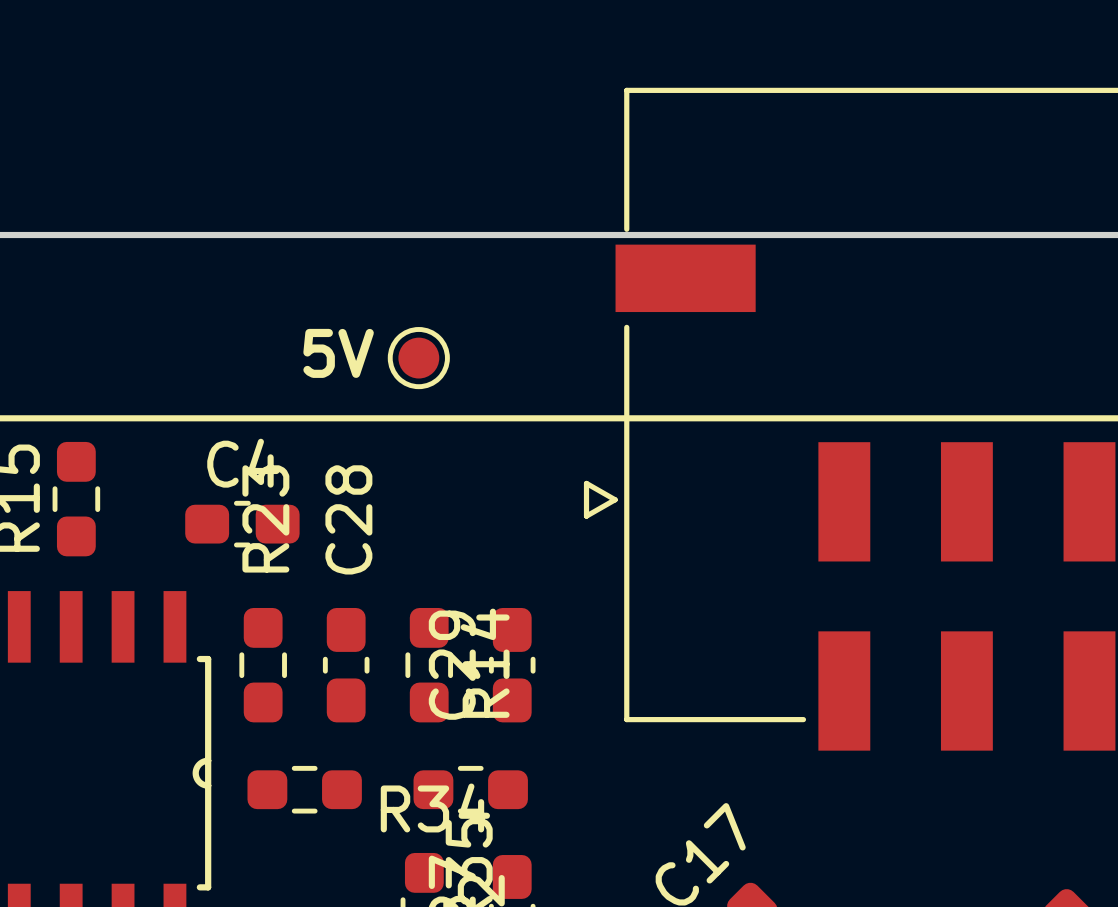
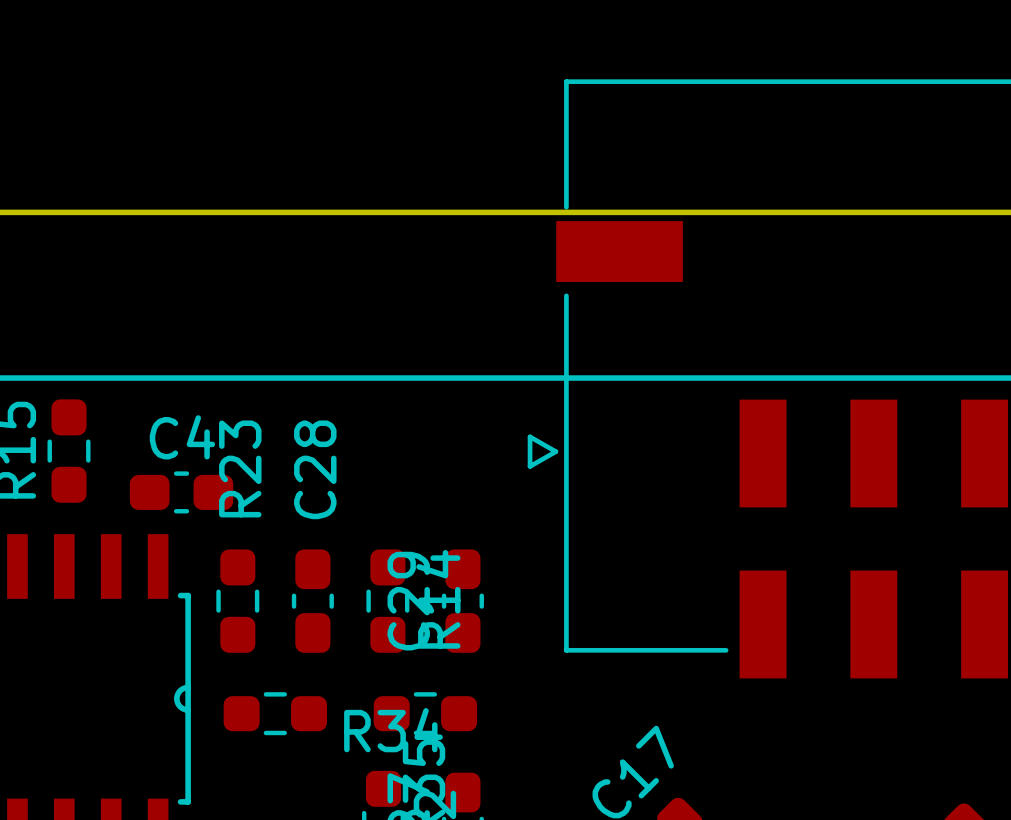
text: 5V (338, 353) -> none
part: (418, 358) -> none
C4 position: (242, 524) -> (181, 492)

